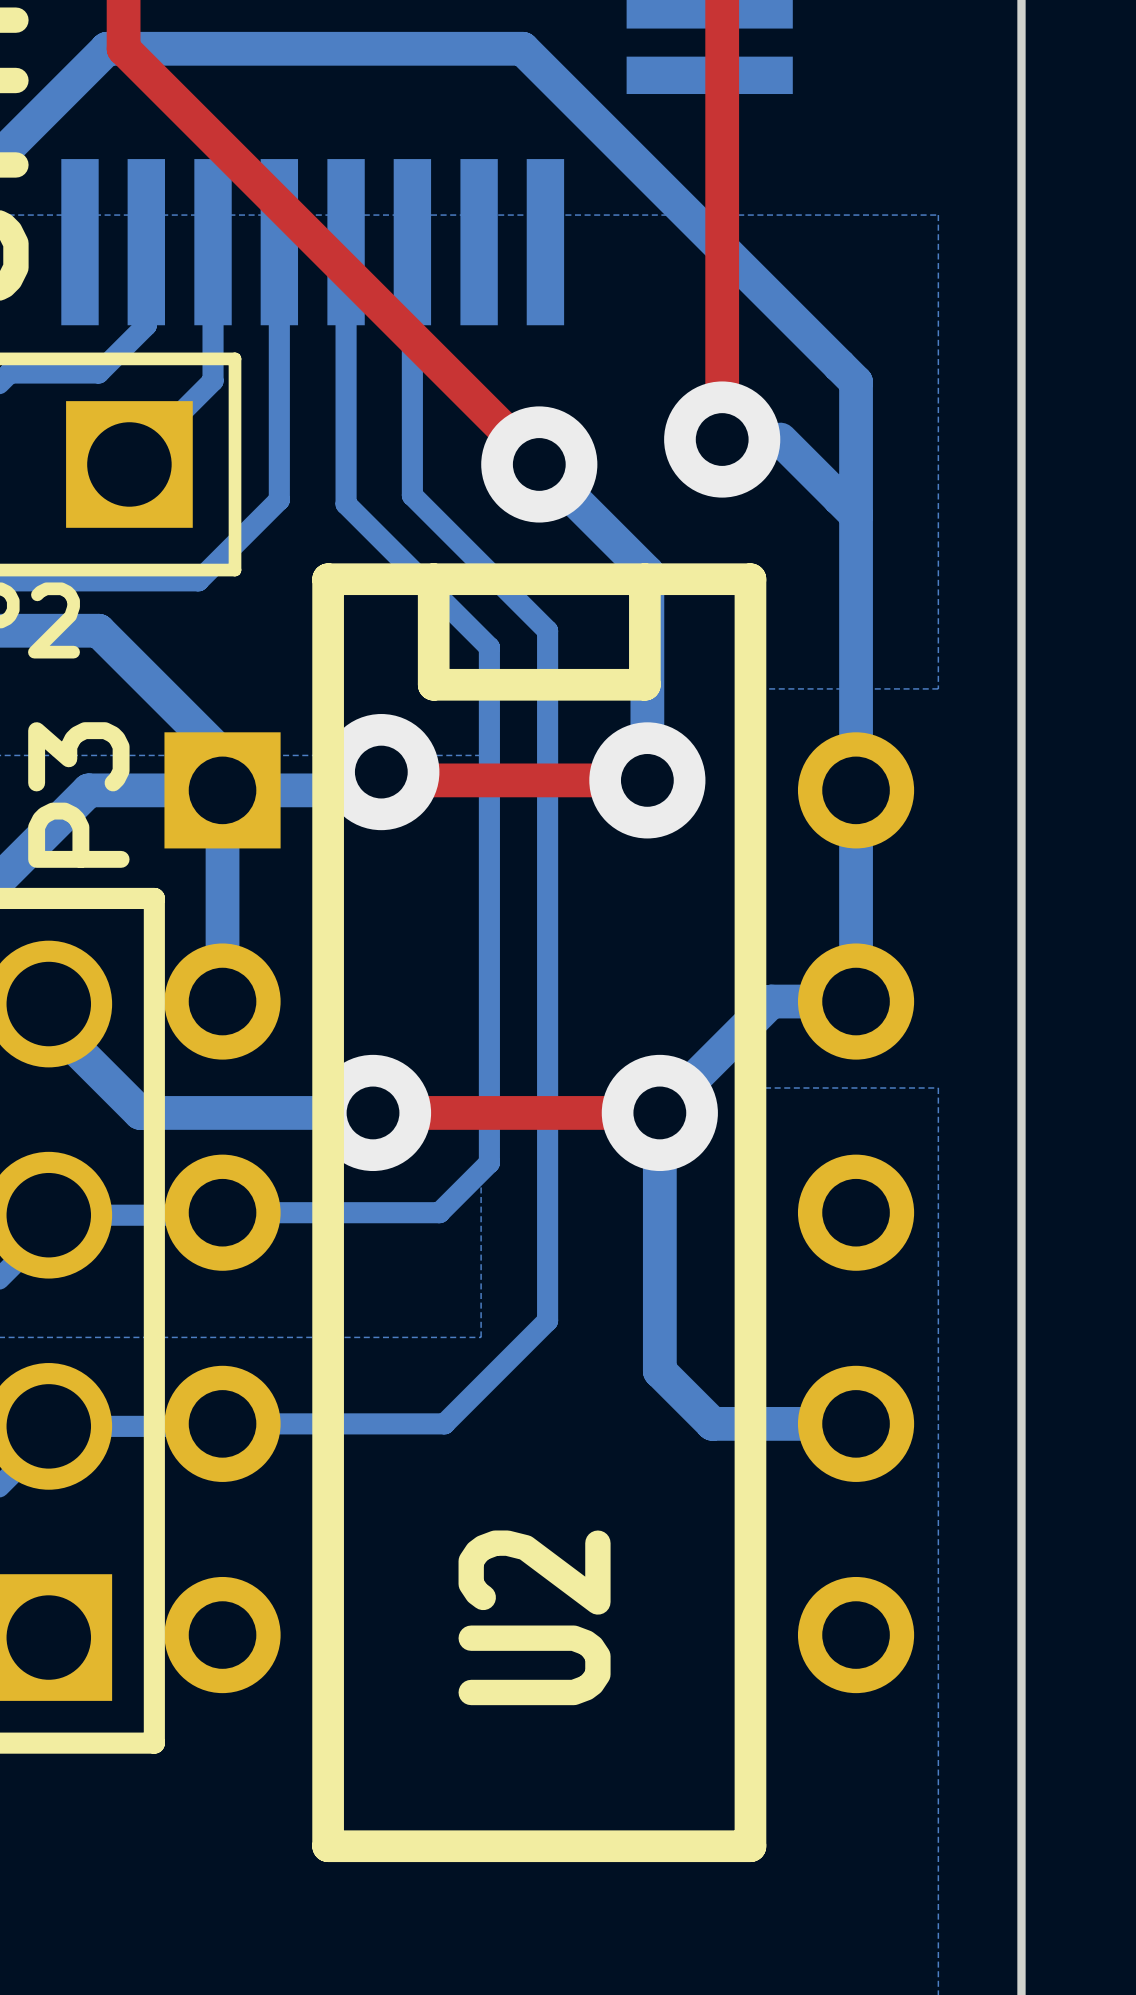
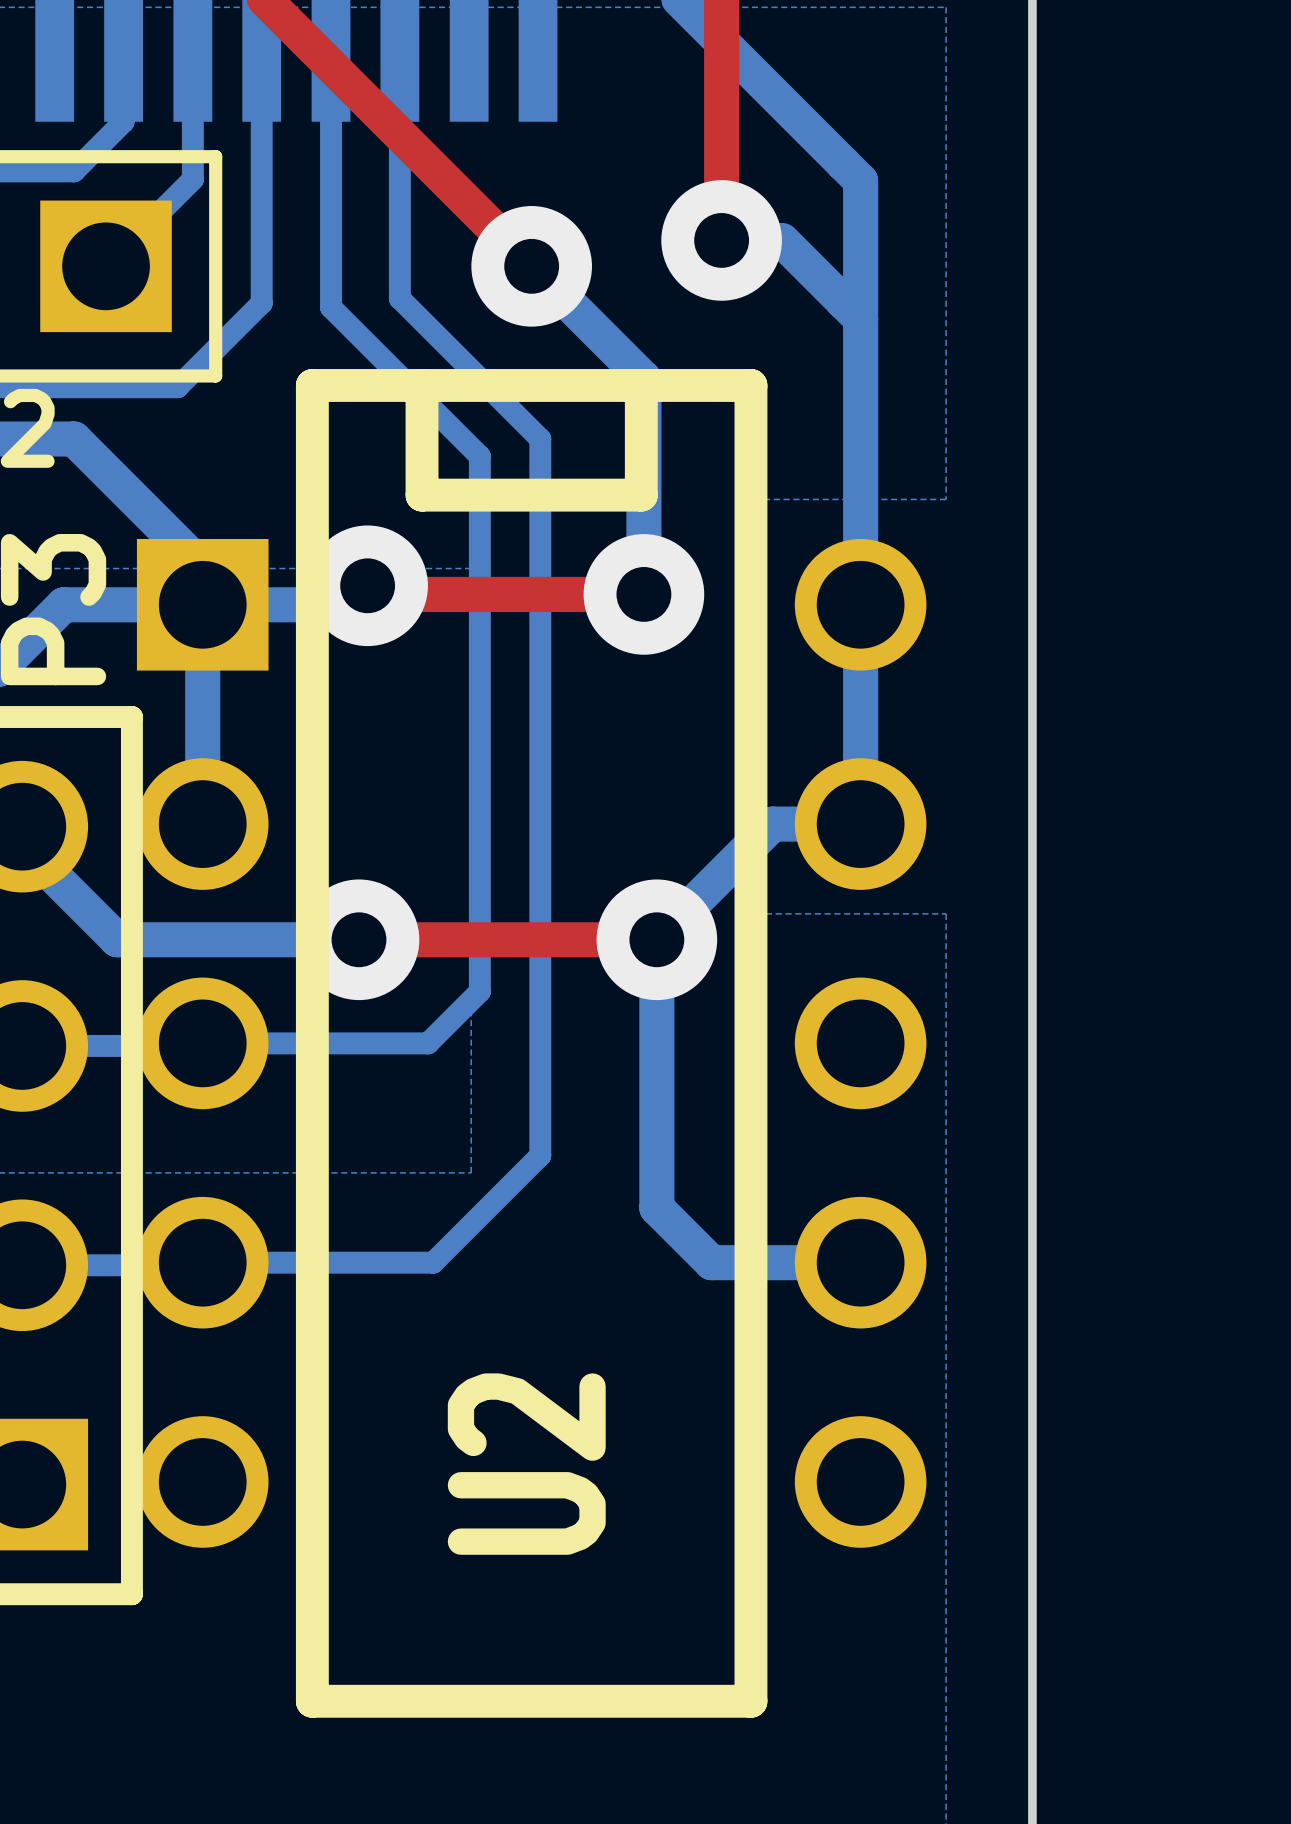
U2 footprint: [164, 563, 915, 1863] -> [136, 369, 927, 1718]

